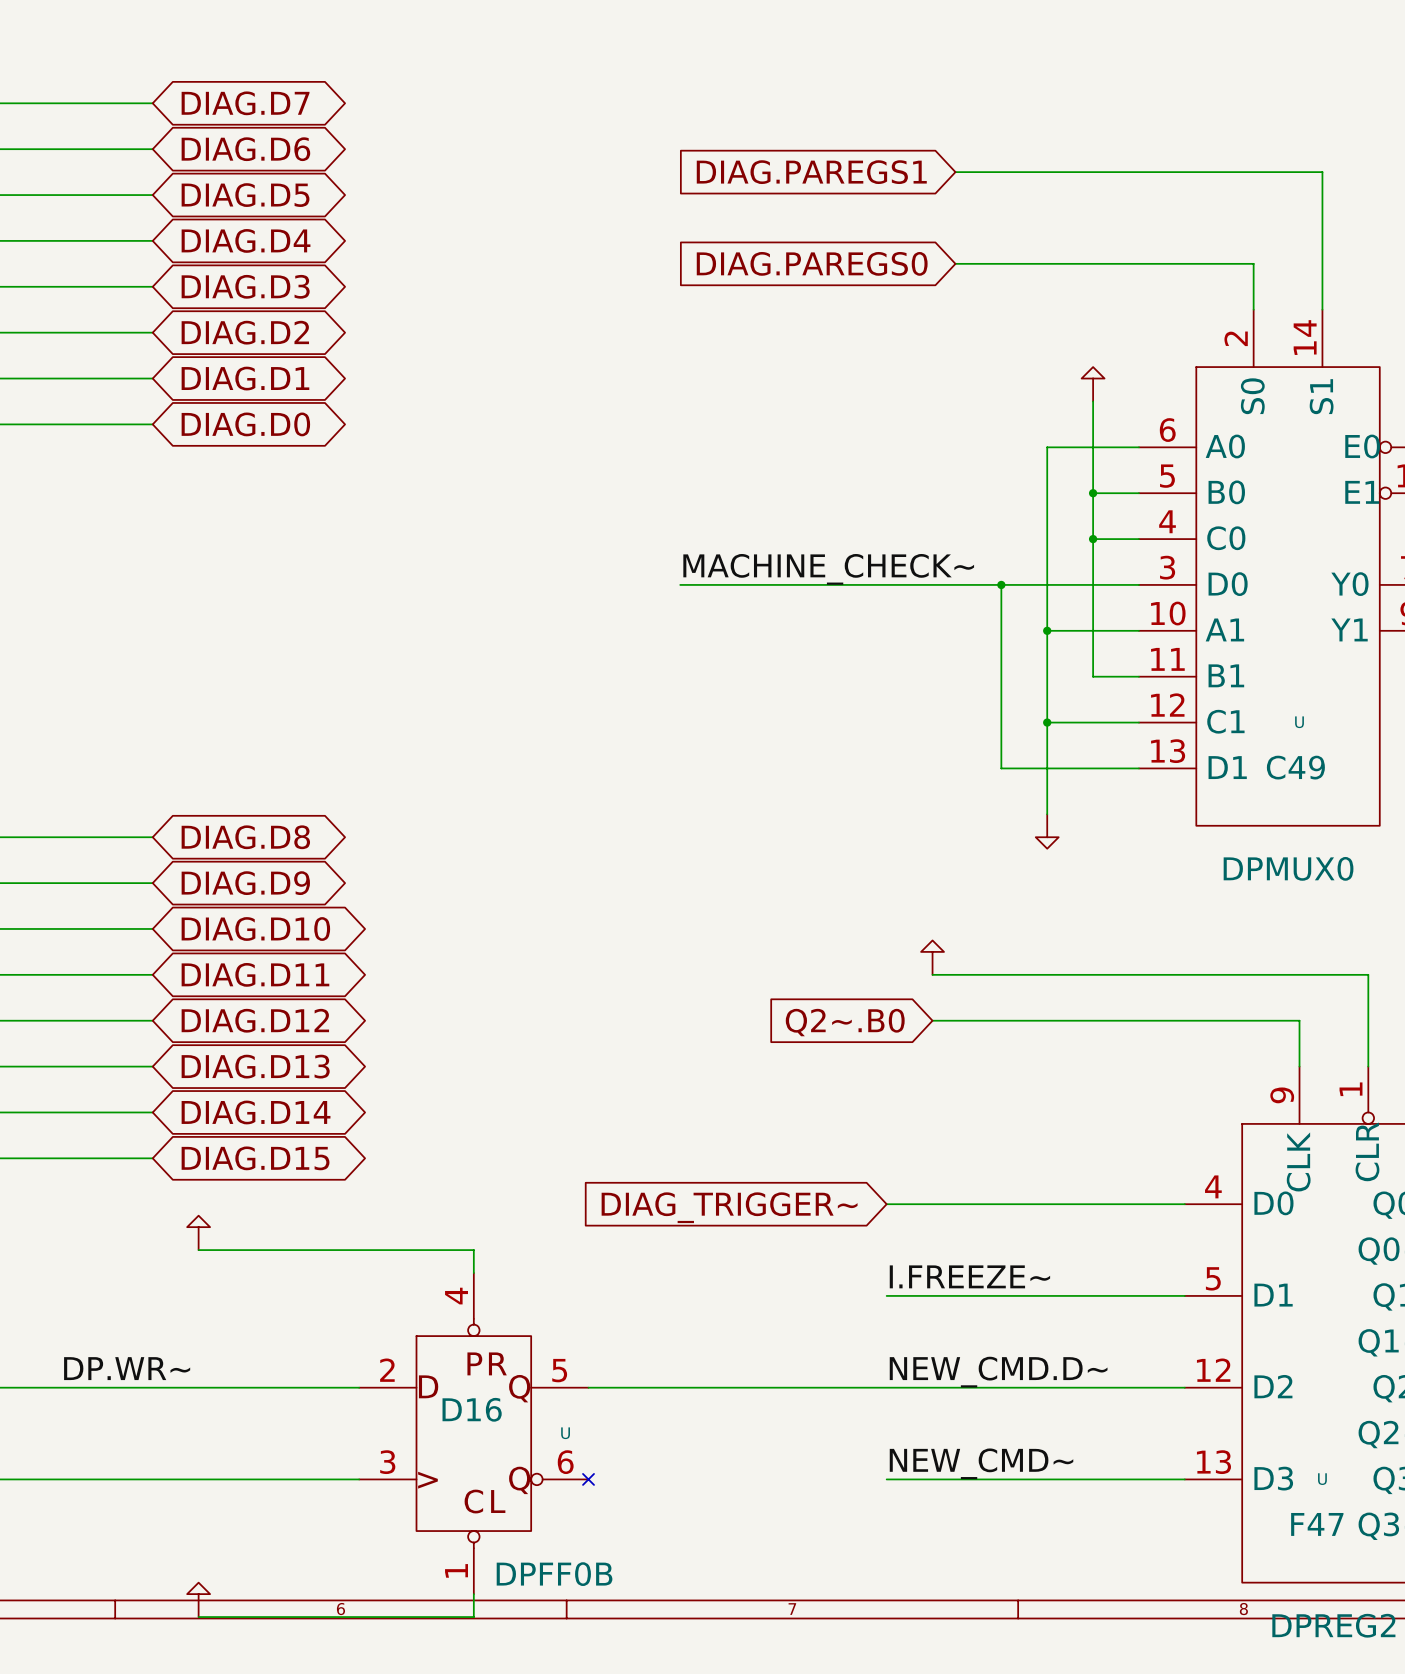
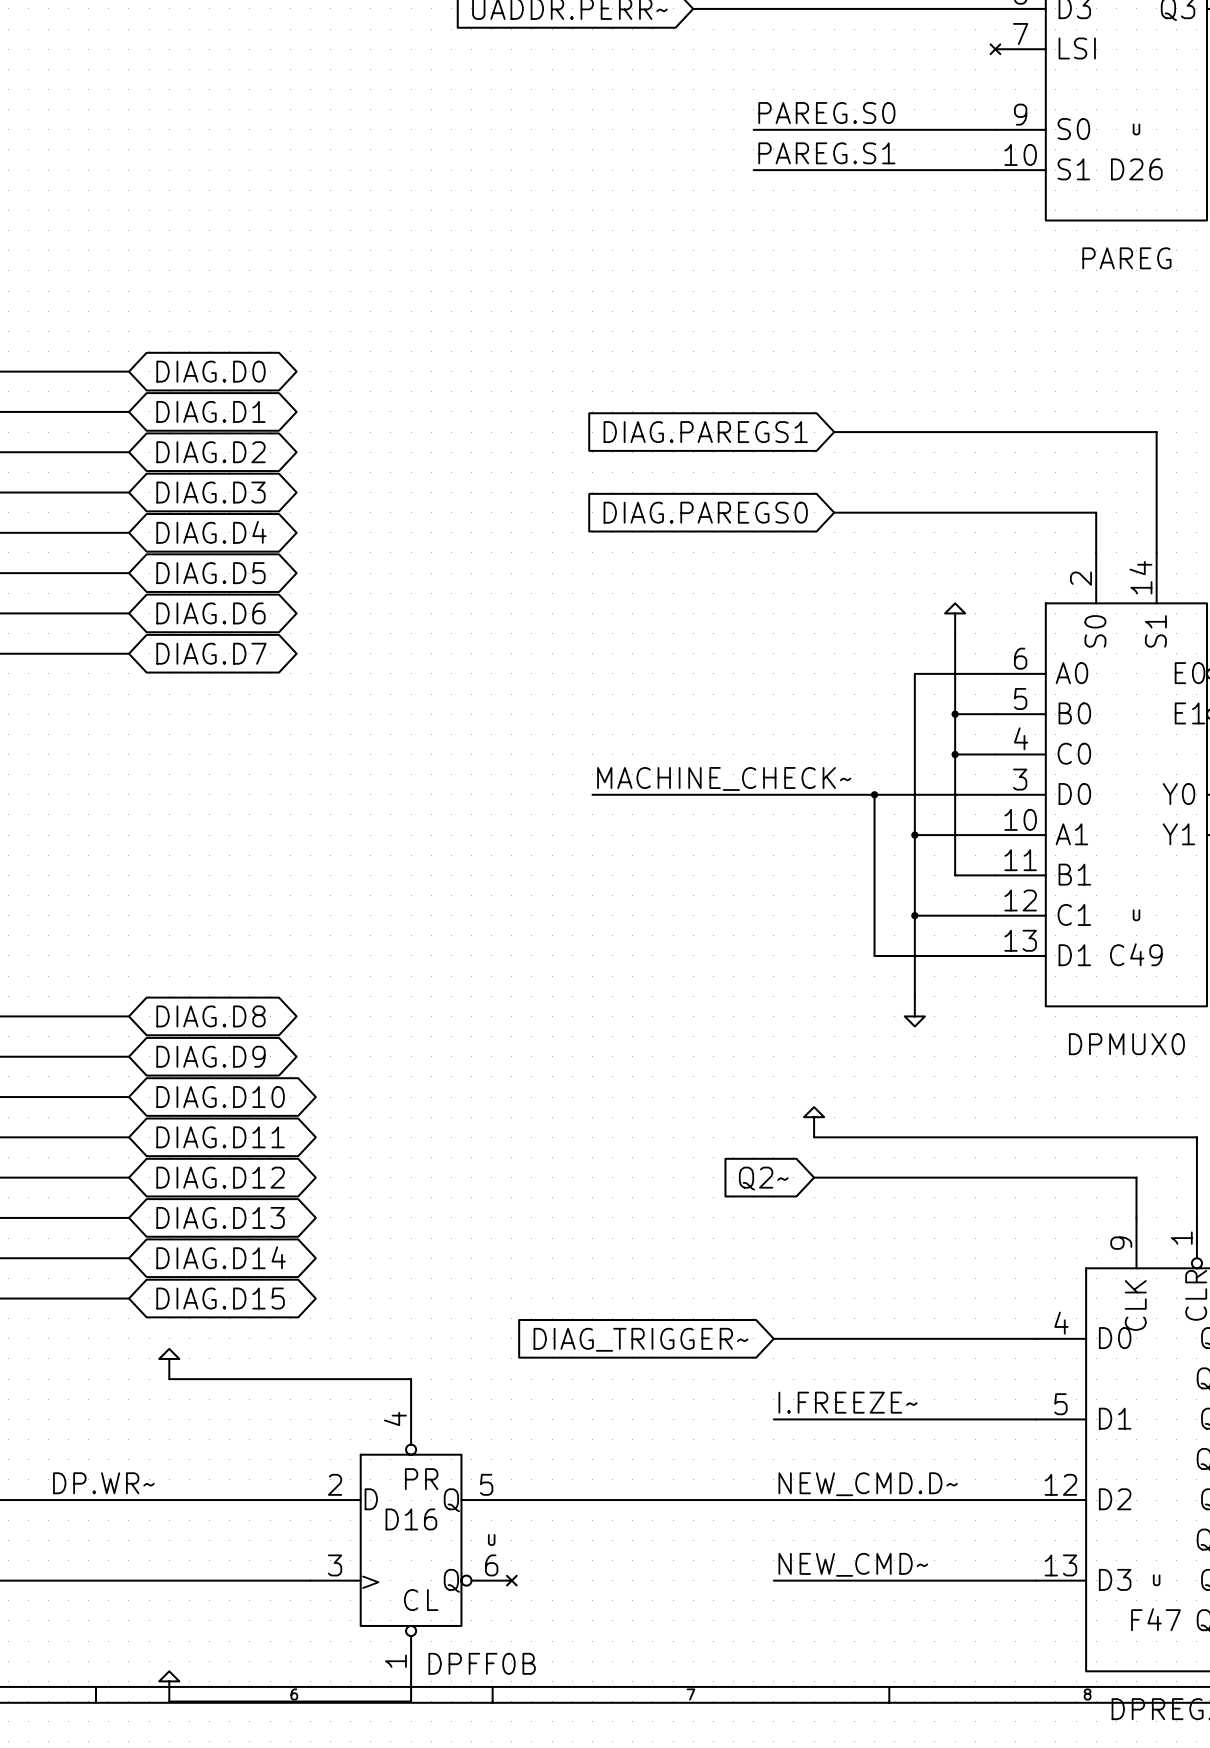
global label: DIAG.D7 (245, 103) -> DIAG.D0 (210, 371)
global label: DIAG.D6 (245, 149) -> DIAG.D1 (210, 411)
global label: DIAG.D5 (245, 195) -> DIAG.D2 (210, 452)
global label: DIAG.D4 (246, 240) -> DIAG.D3 (210, 492)
global label: DIAG.D3 (245, 286) -> DIAG.D4 (211, 532)
global label: DIAG.D2 (245, 332) -> DIAG.D5 (210, 573)
global label: DIAG.D1 (245, 378) -> DIAG.D6 (210, 613)
global label: DIAG.D0 (245, 424) -> DIAG.D7 (211, 653)
global label: Q2~.B0 (845, 1022) -> Q2~ (763, 1178)

